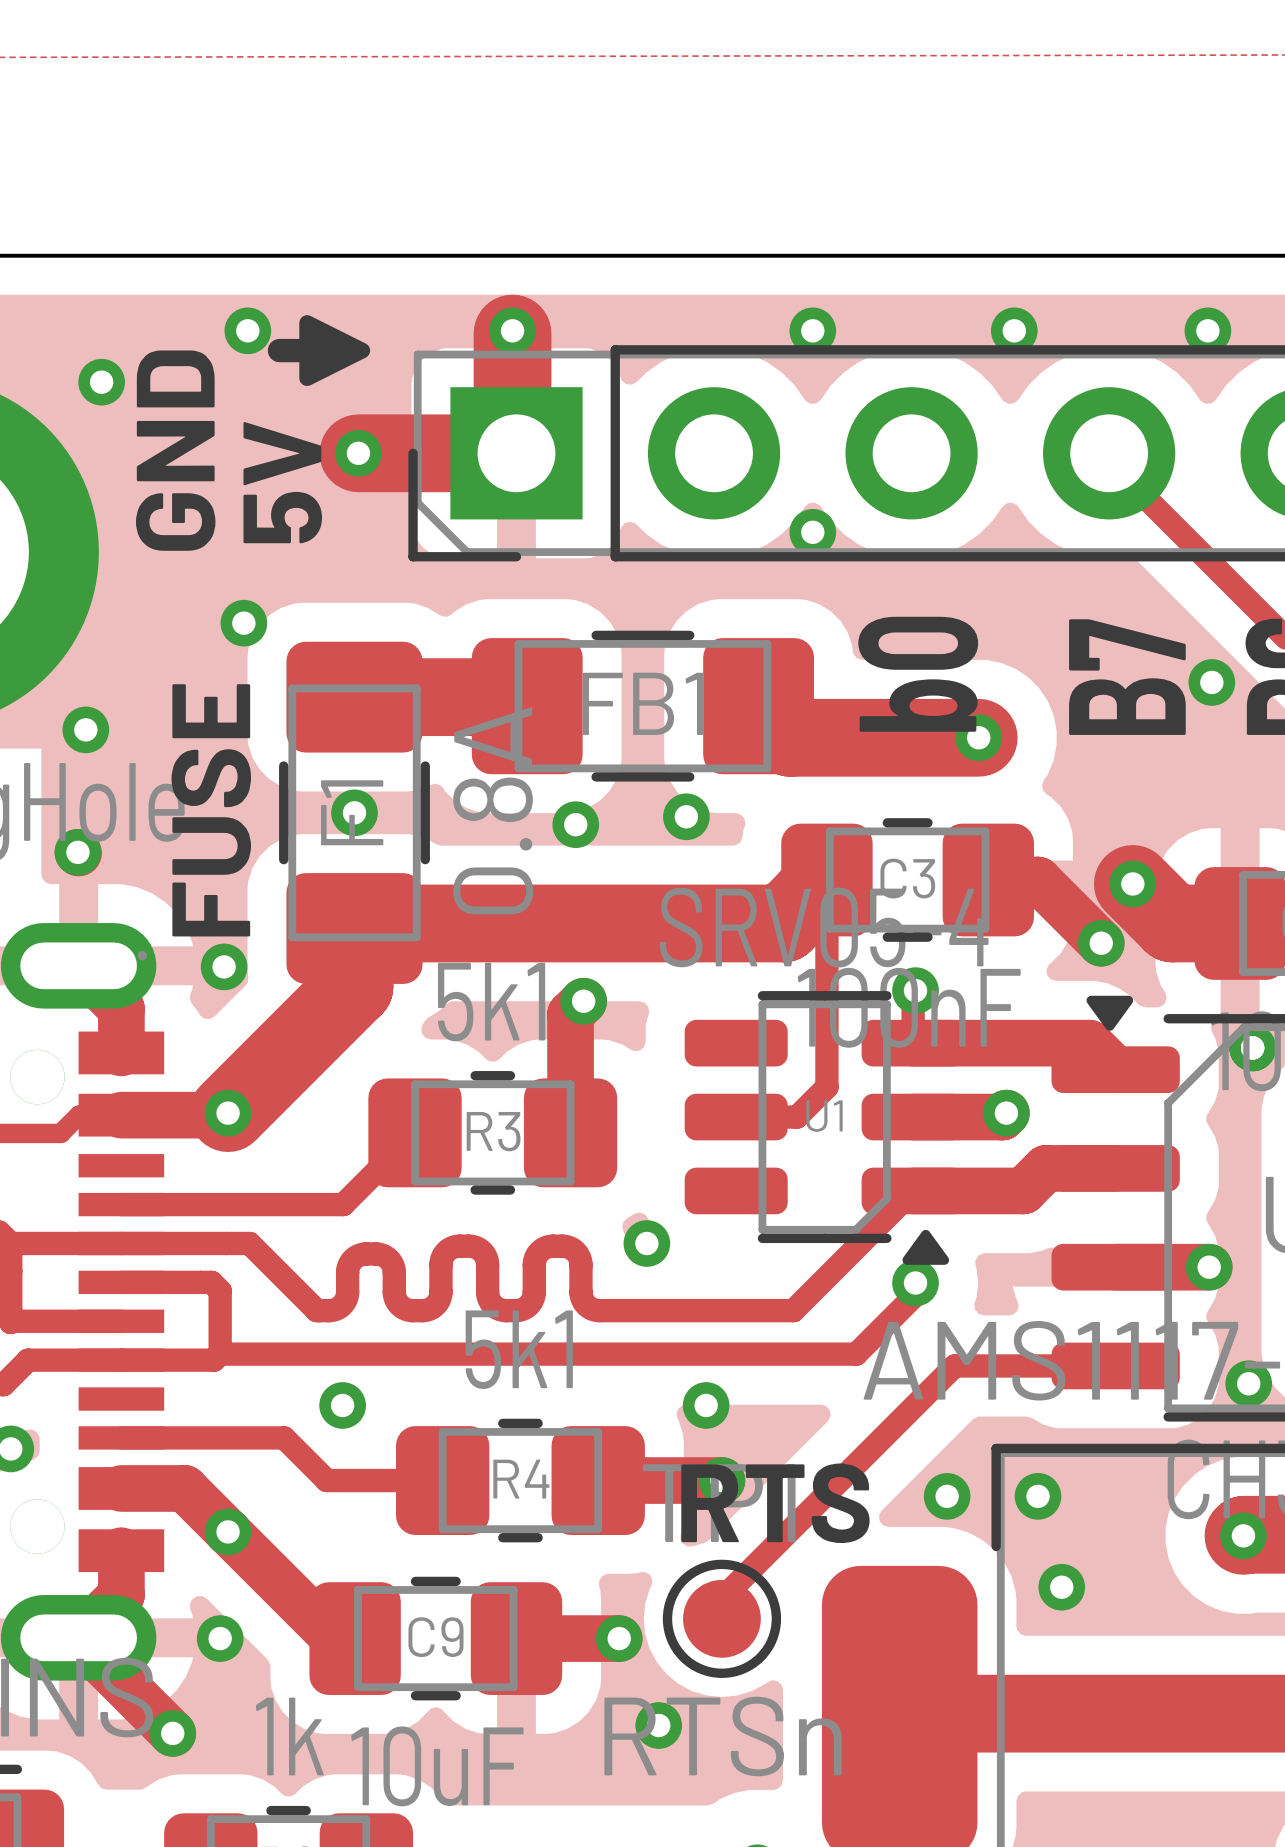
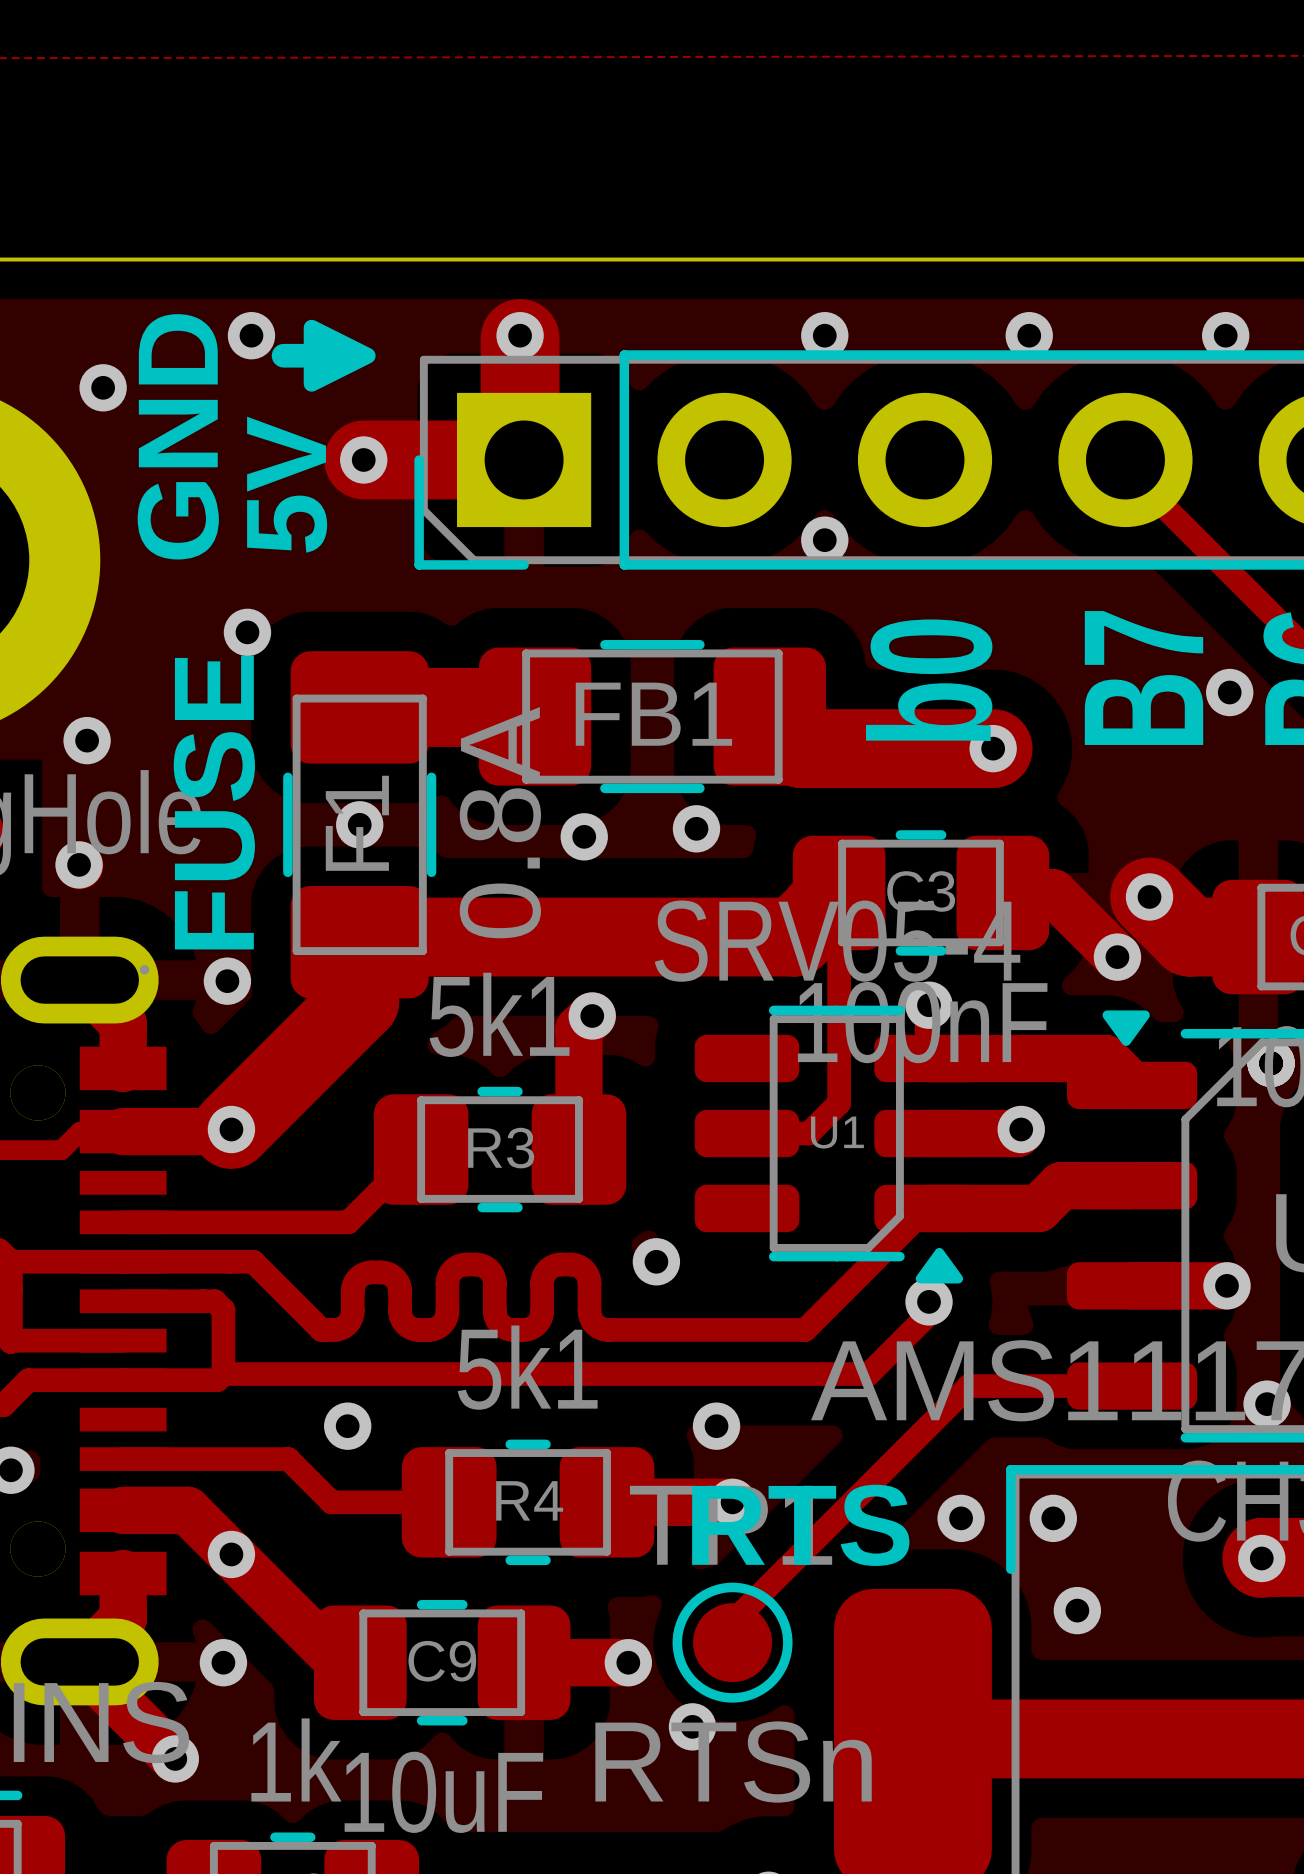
via position: (658, 1725) -> (692, 1726)

